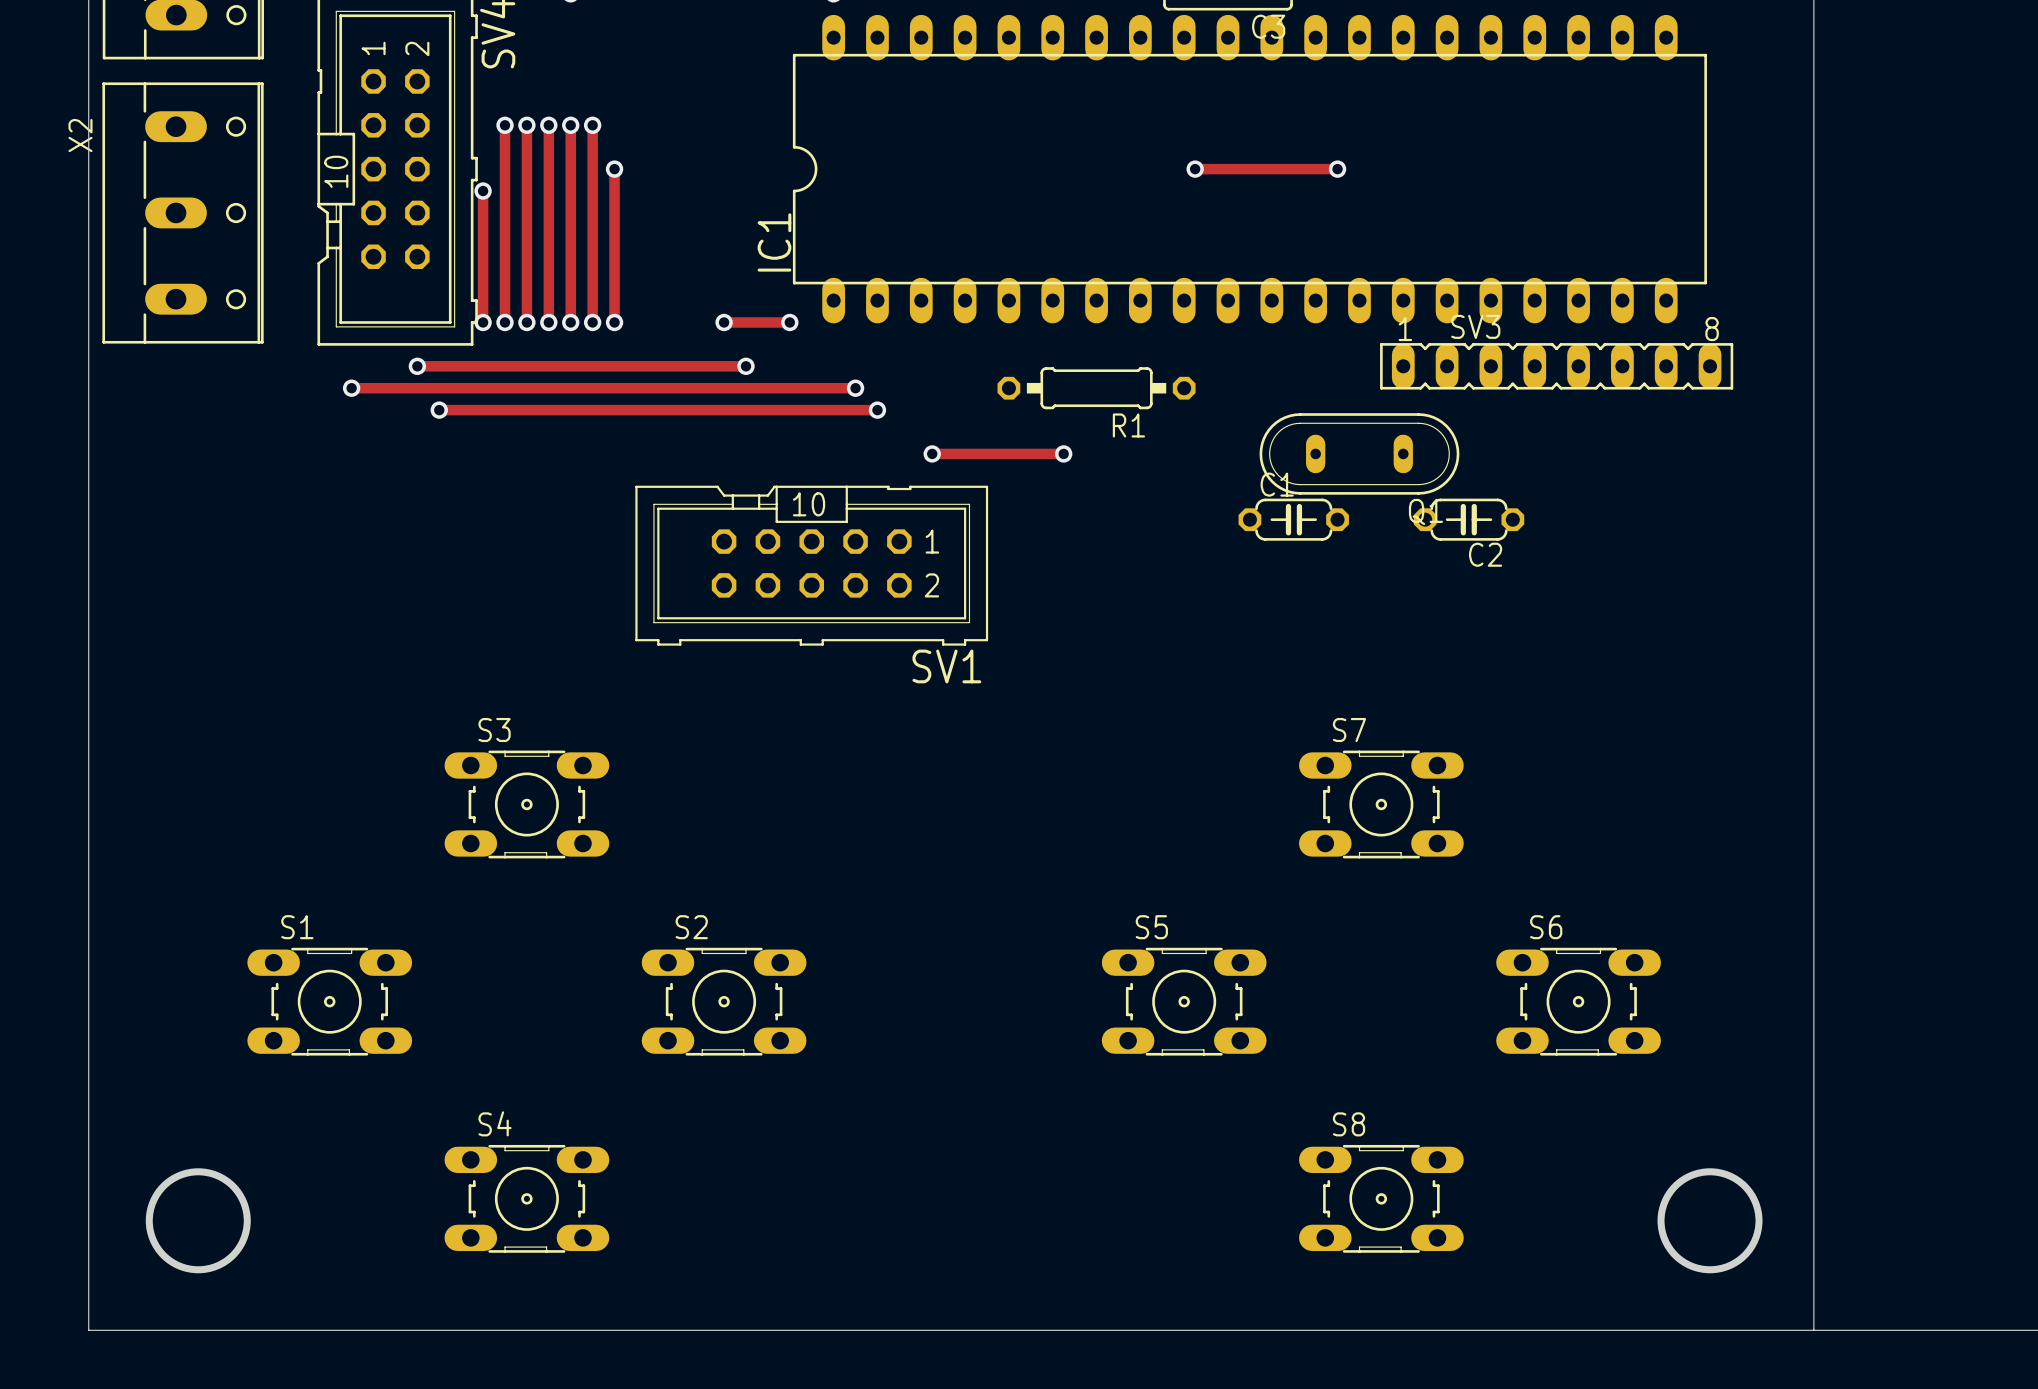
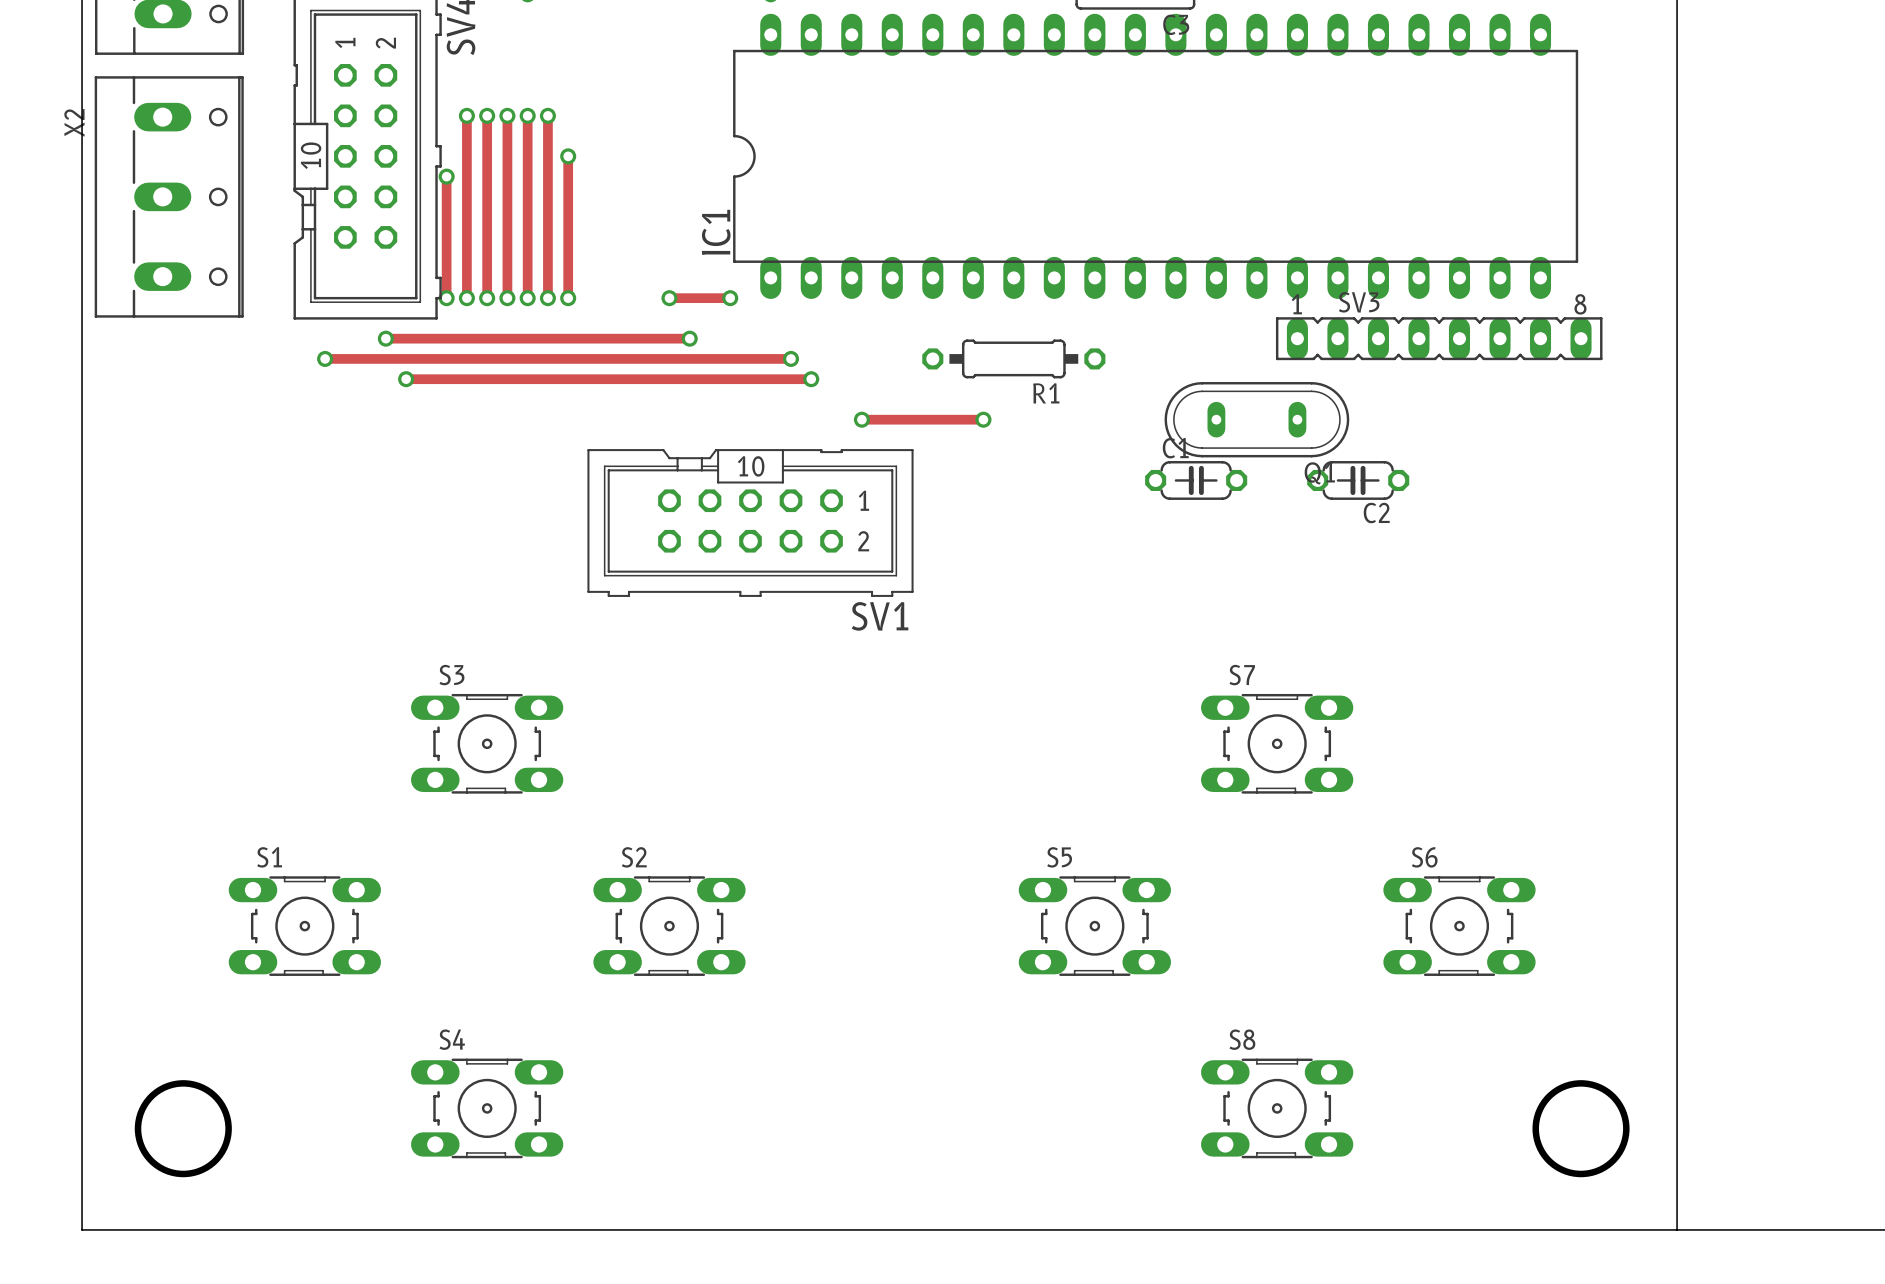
track: (1195, 169) (1337, 169) -> none
via: (1195, 169) -> none
via: (1337, 169) -> none

